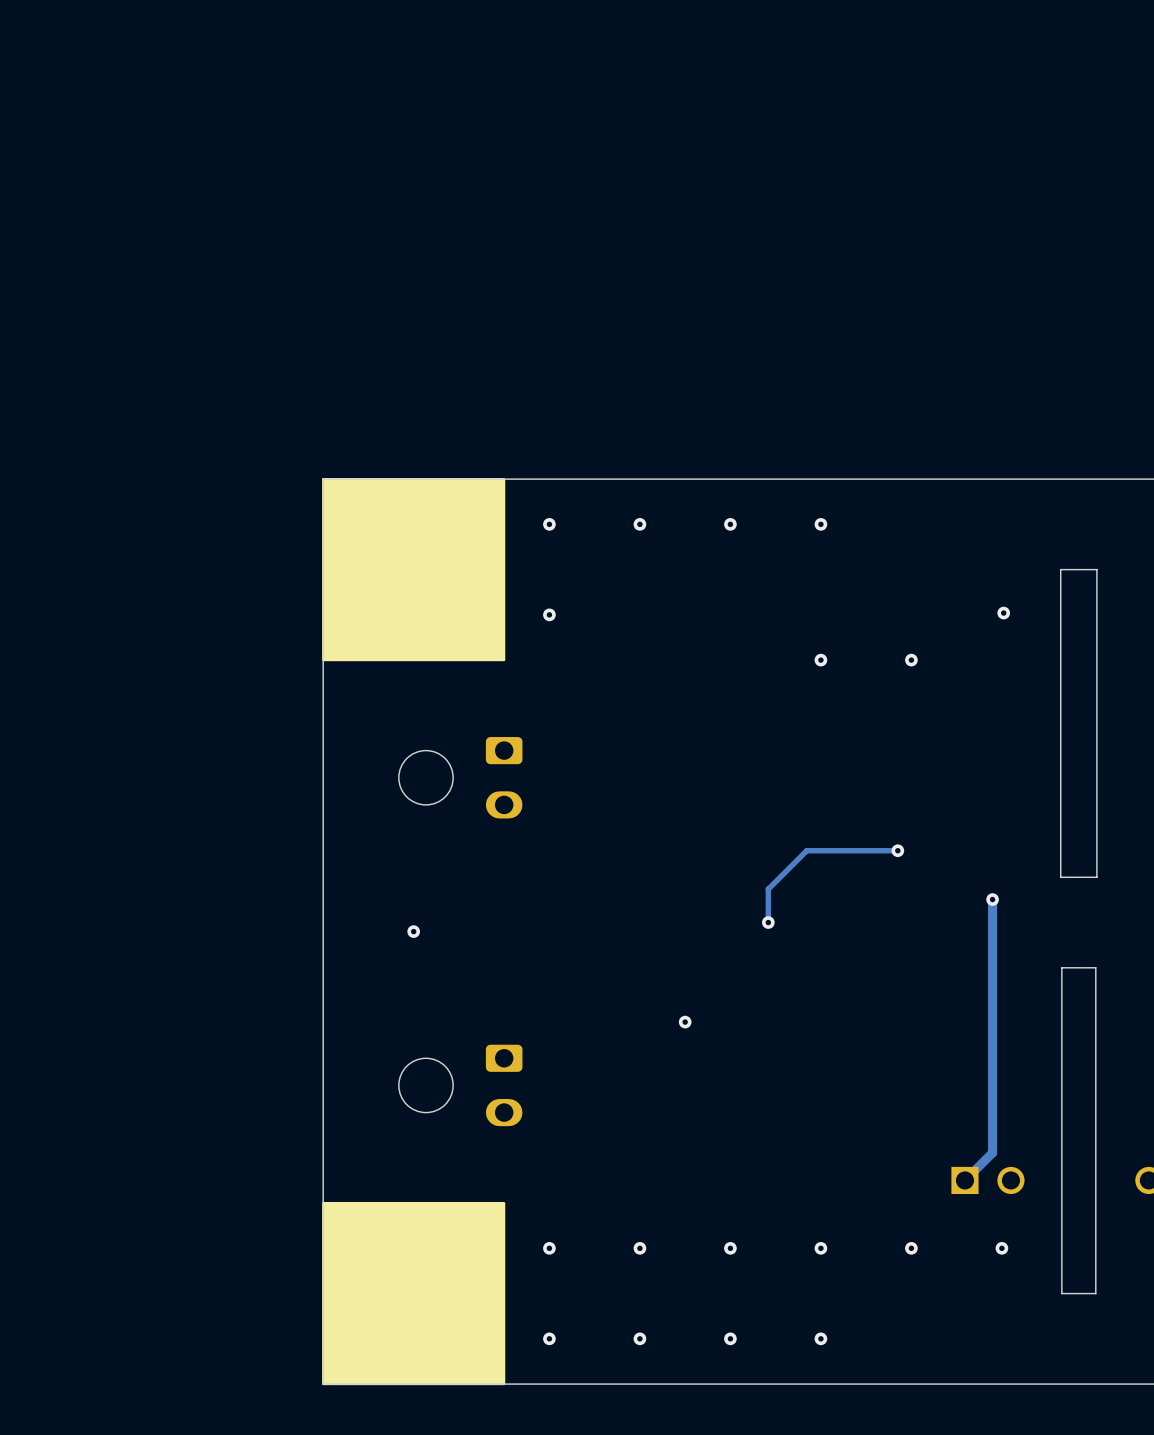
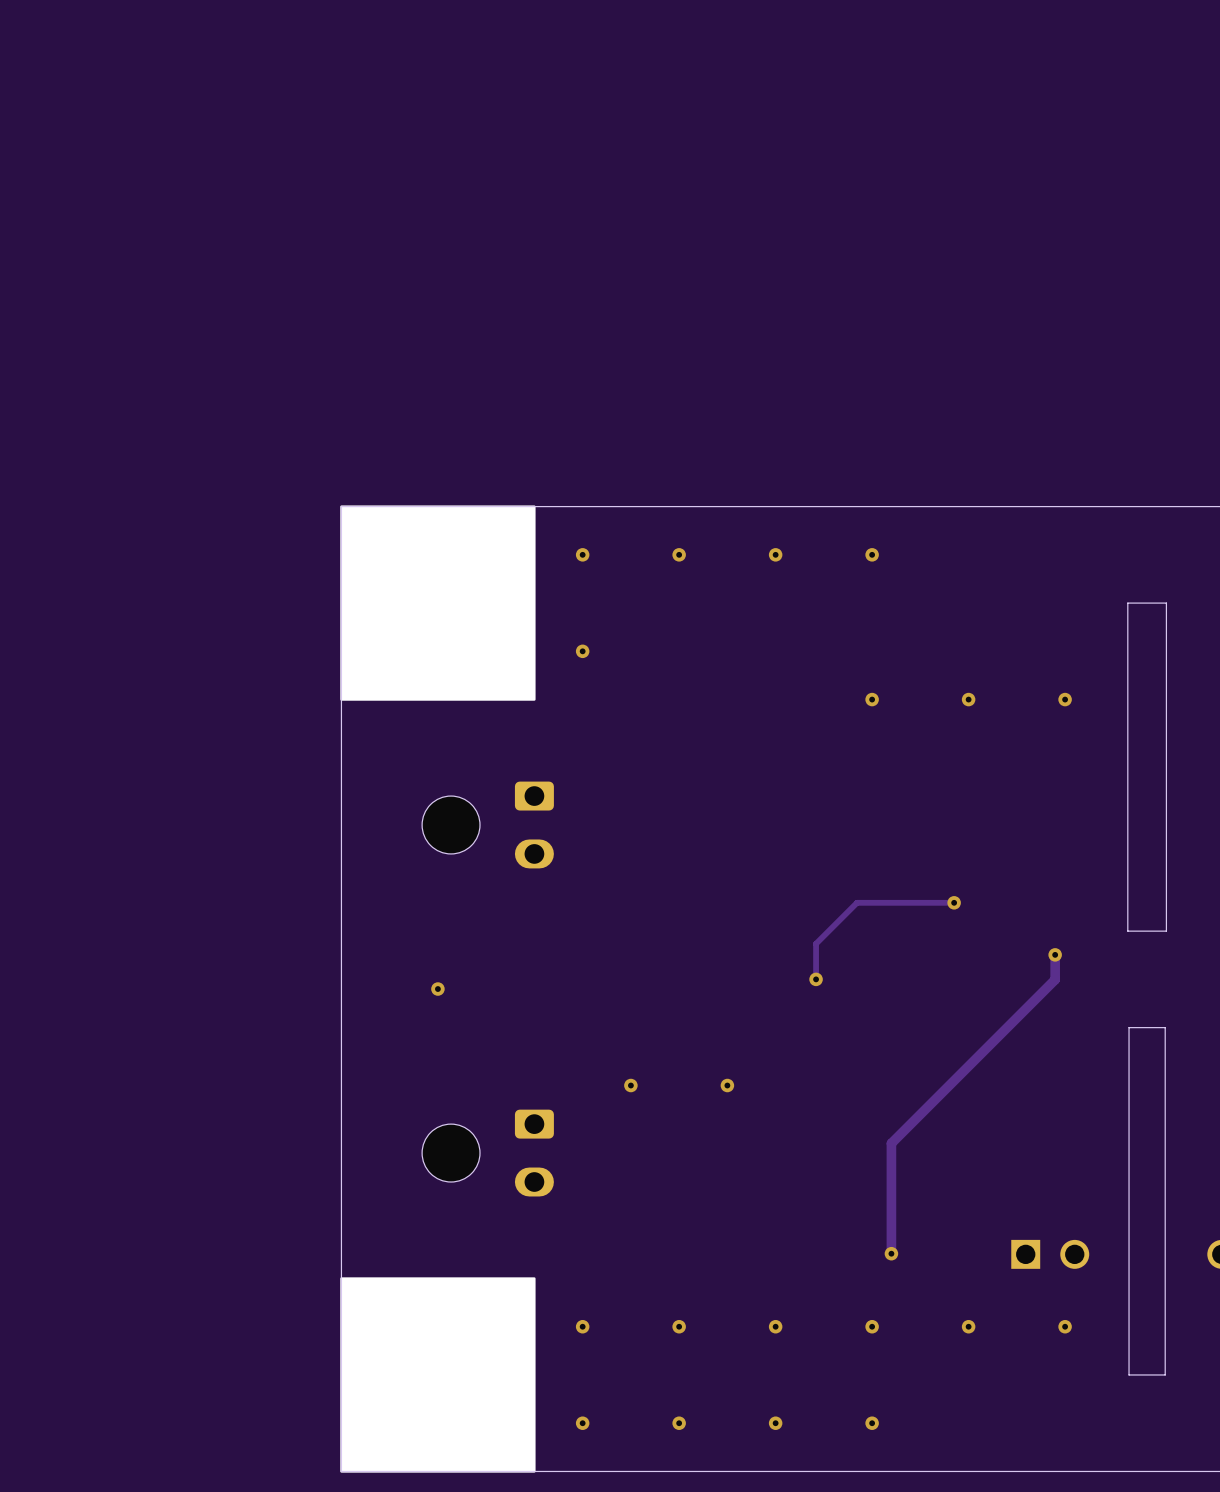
via position: (1003, 613) -> (1065, 699)
track: (992, 922) (992, 1152) (964, 1180) -> (1055, 979) (891, 1143) (891, 1249)
via: none -> (630, 1085)
via: none -> (891, 1253)

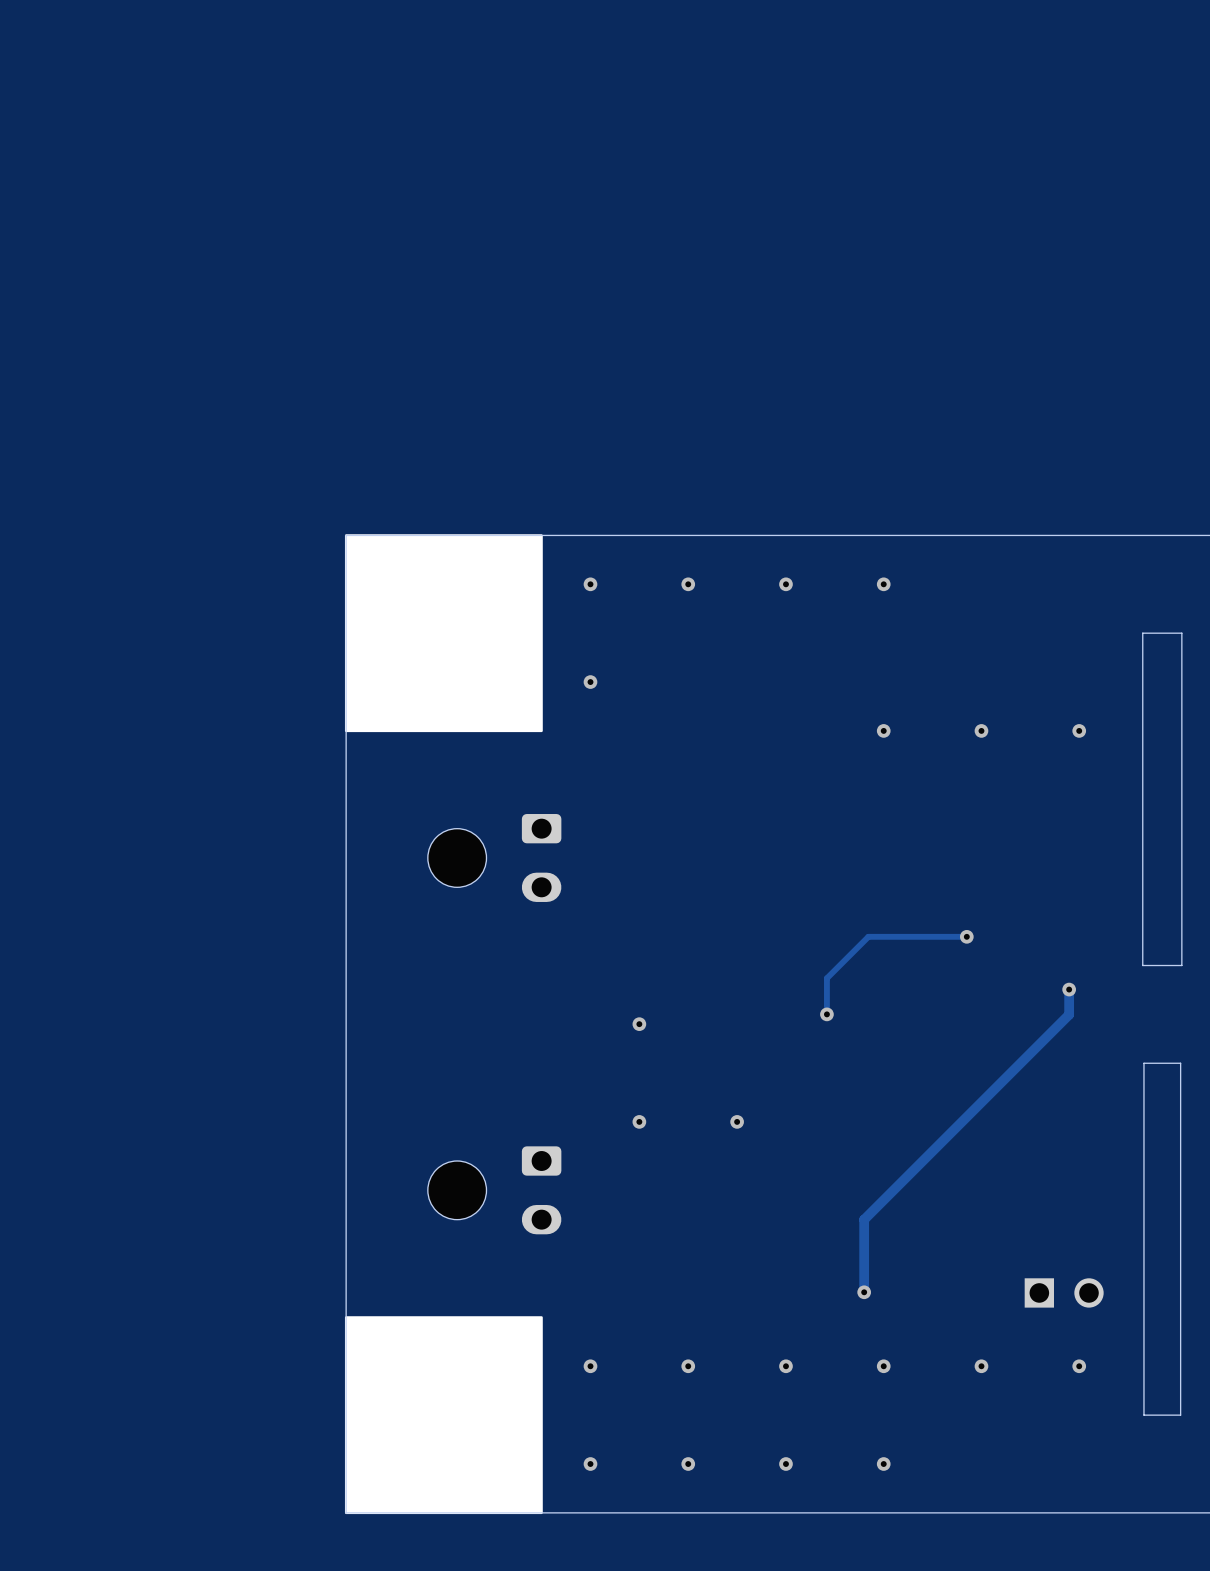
via: (437, 989) -> none
via: none -> (639, 1024)
track: (891, 1143) (891, 1249) -> (903, 1180) (864, 1219) (864, 1292)
via position: (891, 1253) -> (864, 1292)

